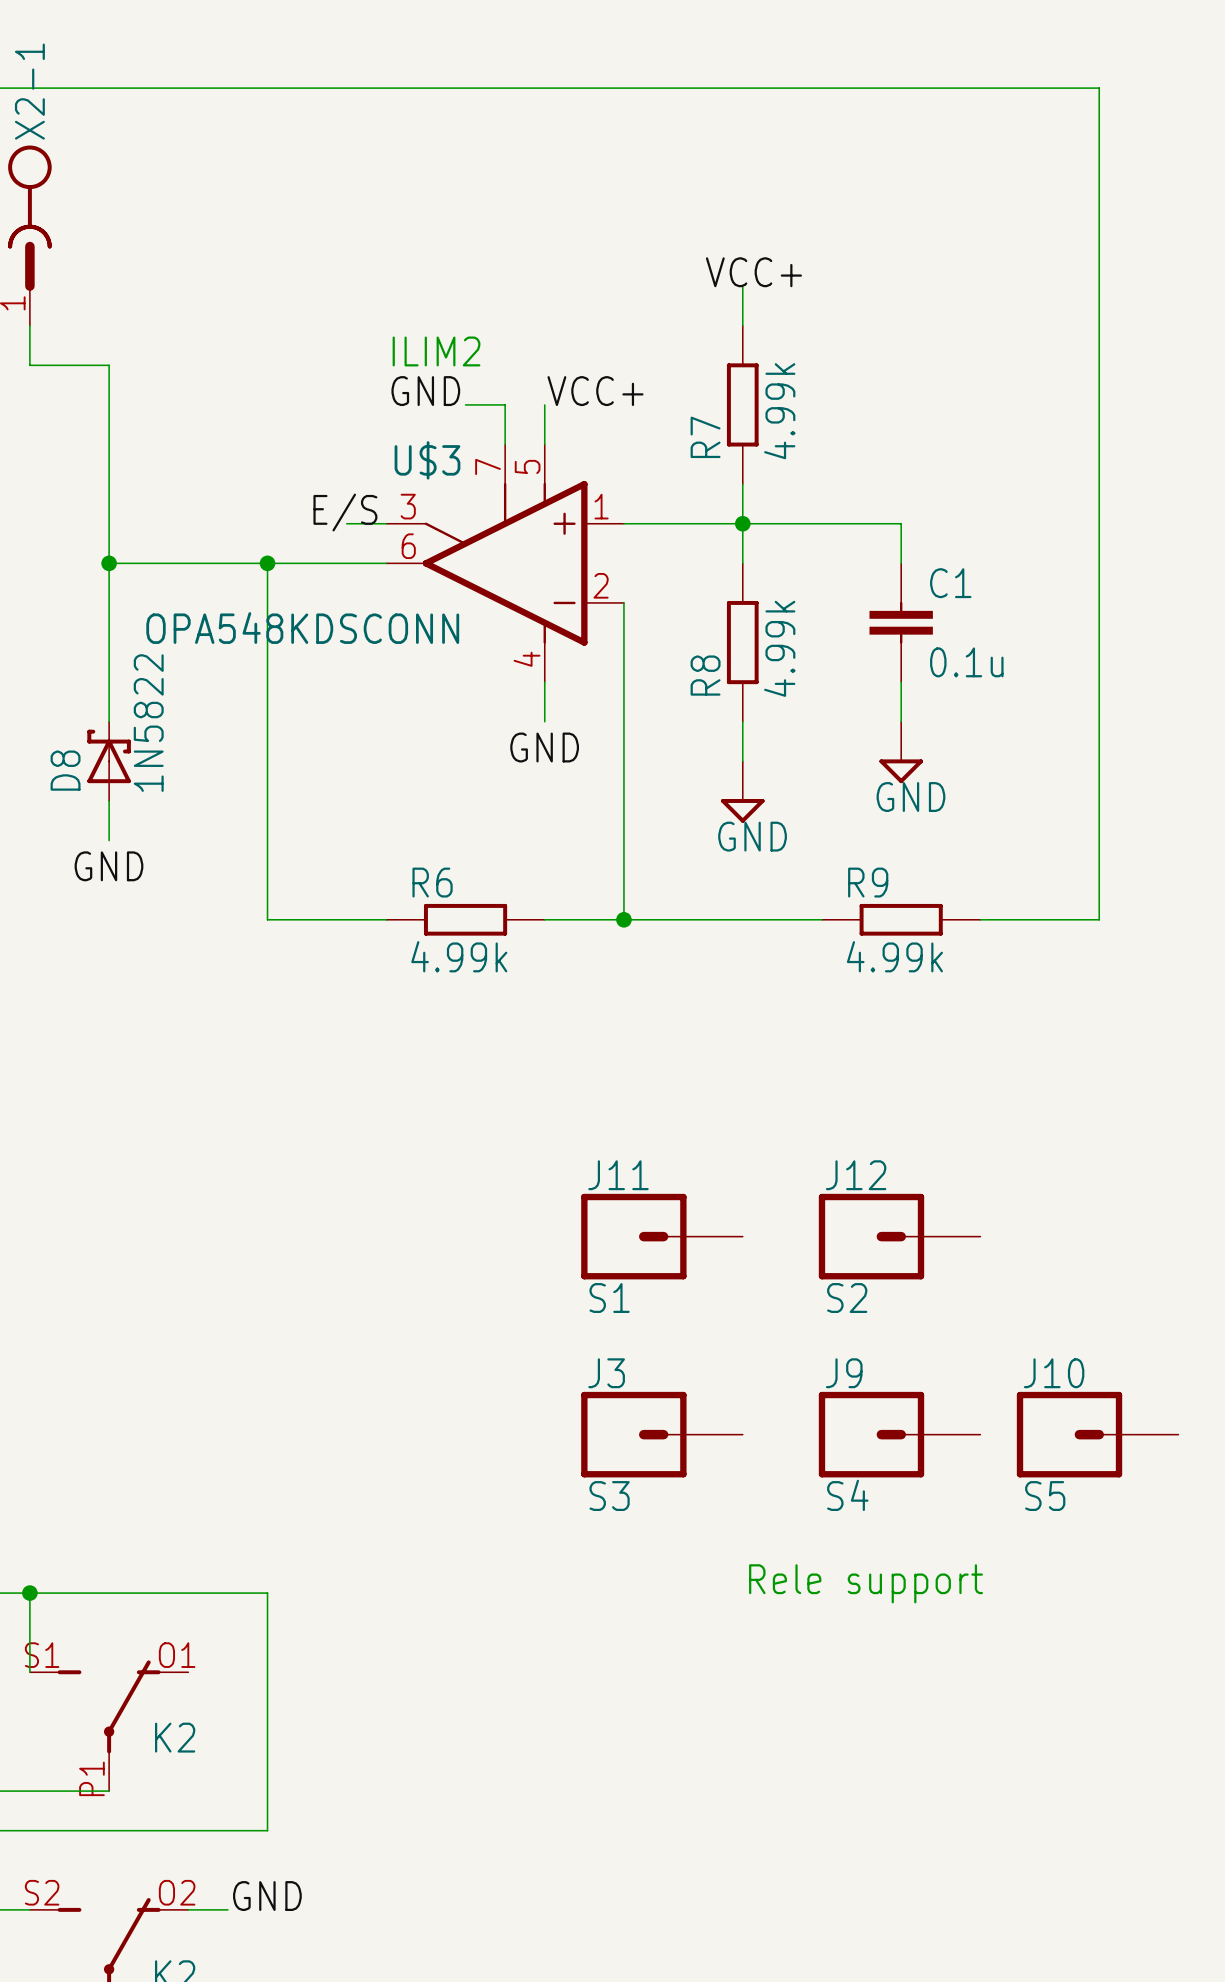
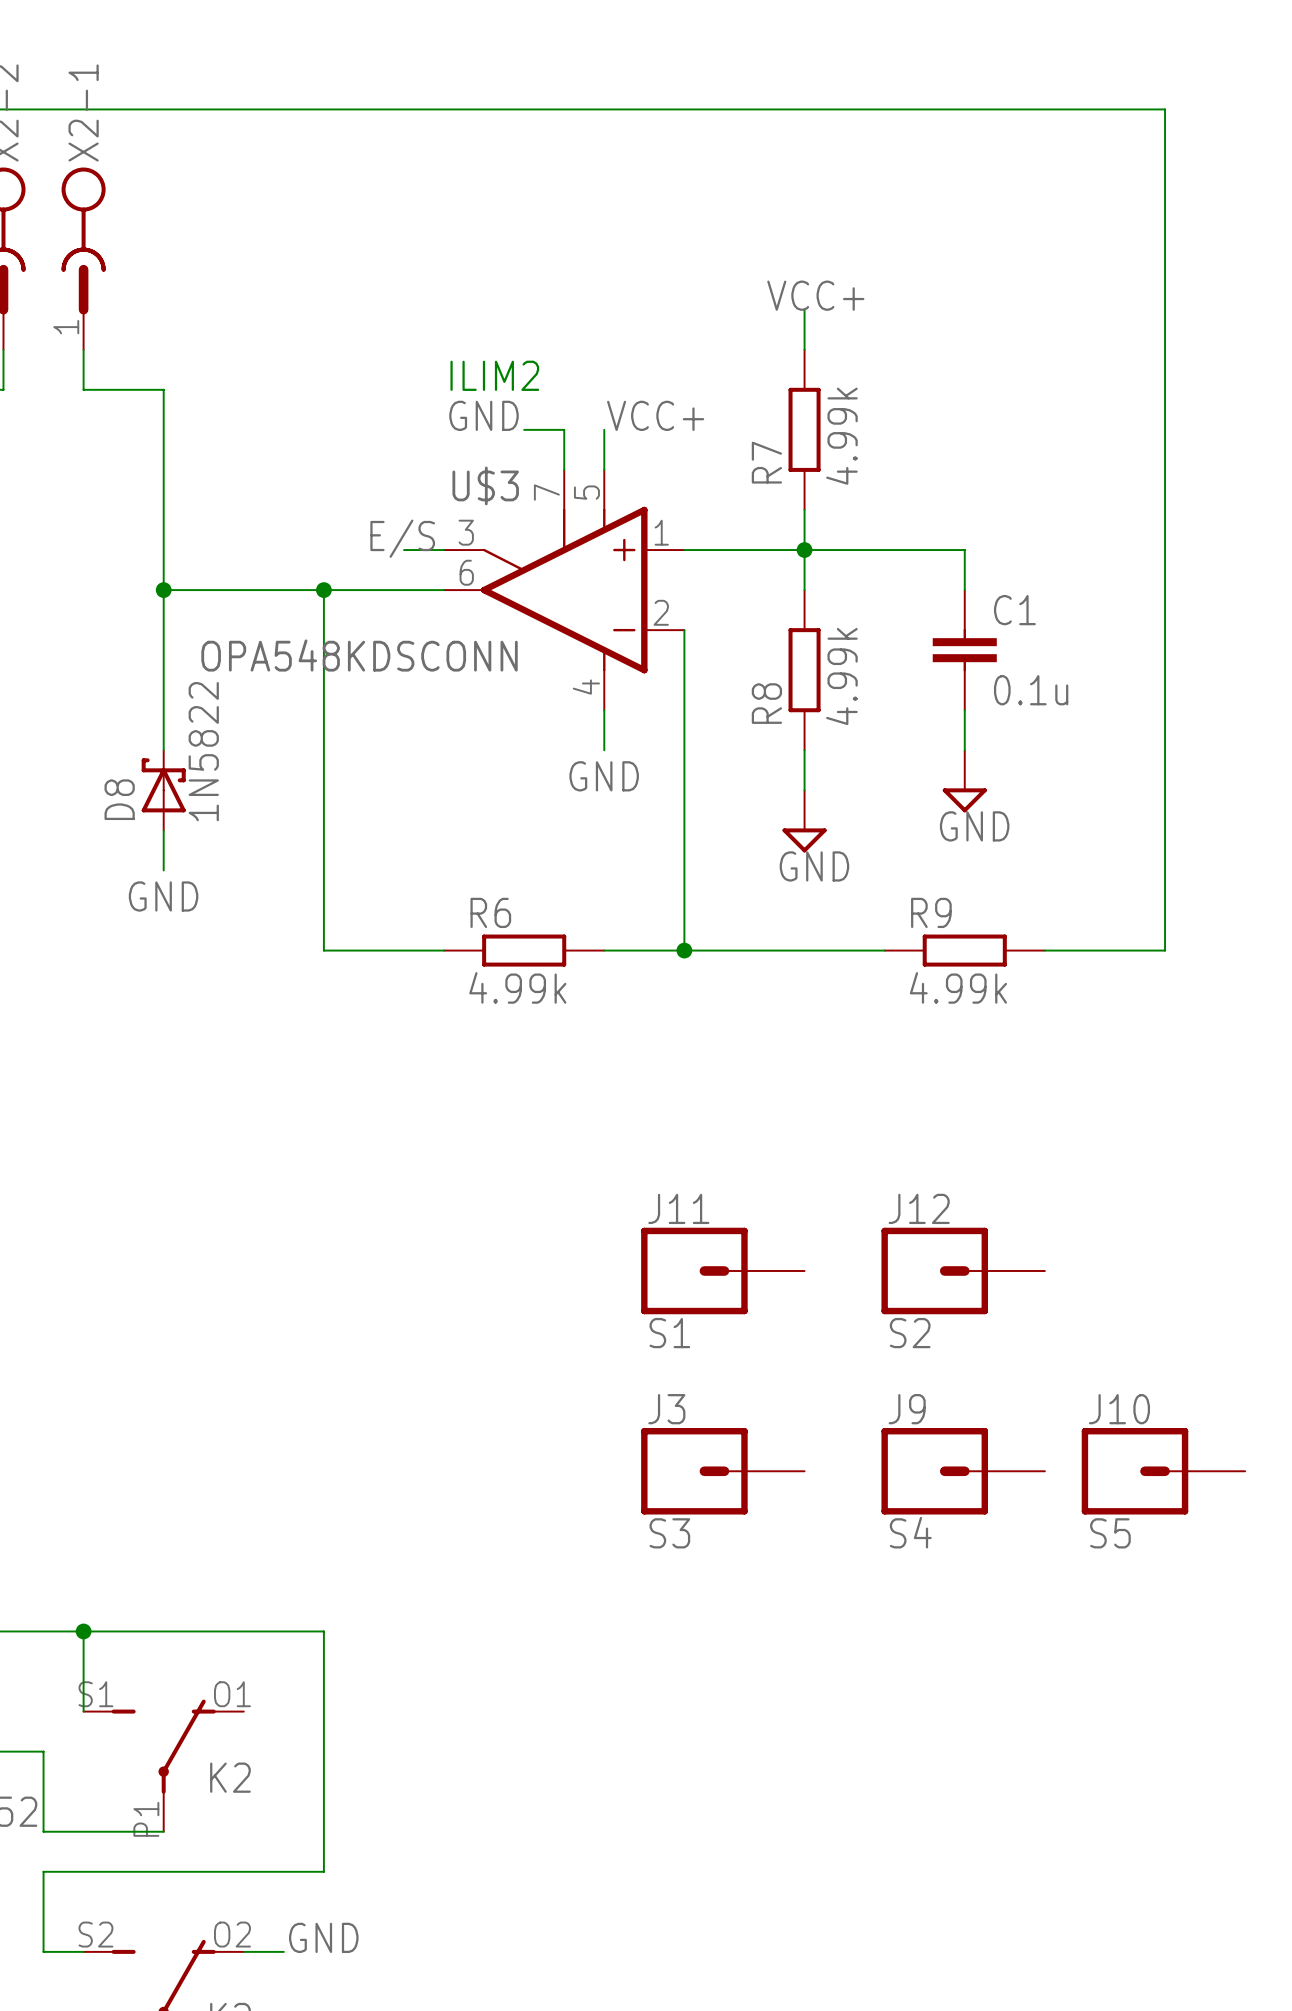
text: Rele support (866, 1583) -> none

